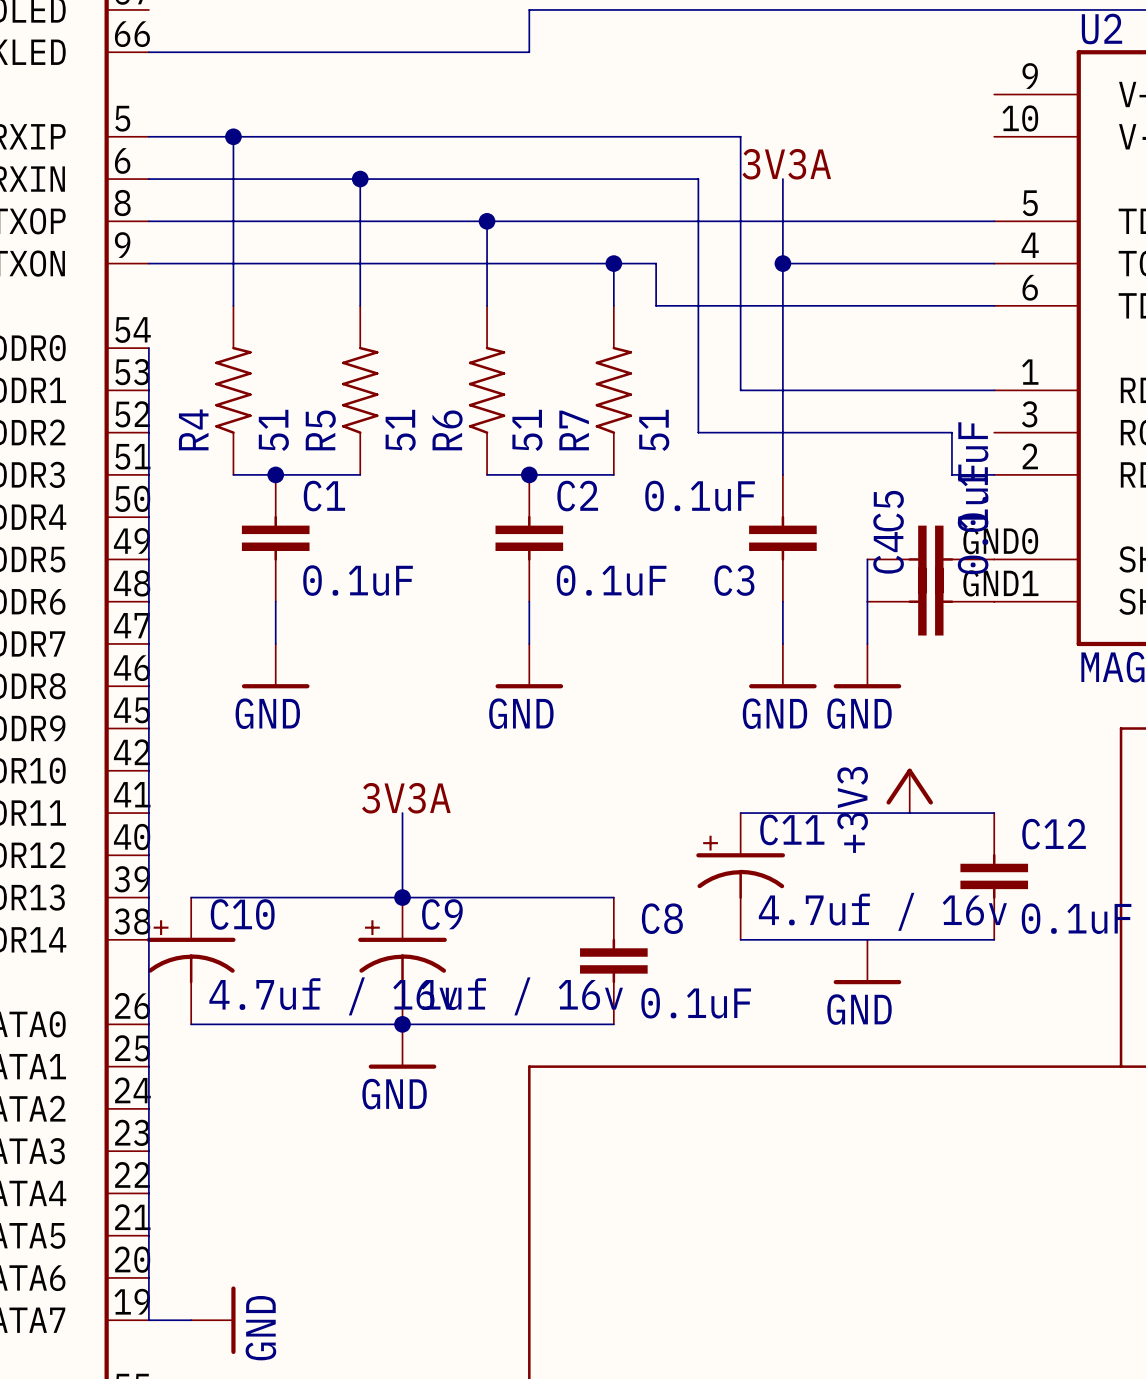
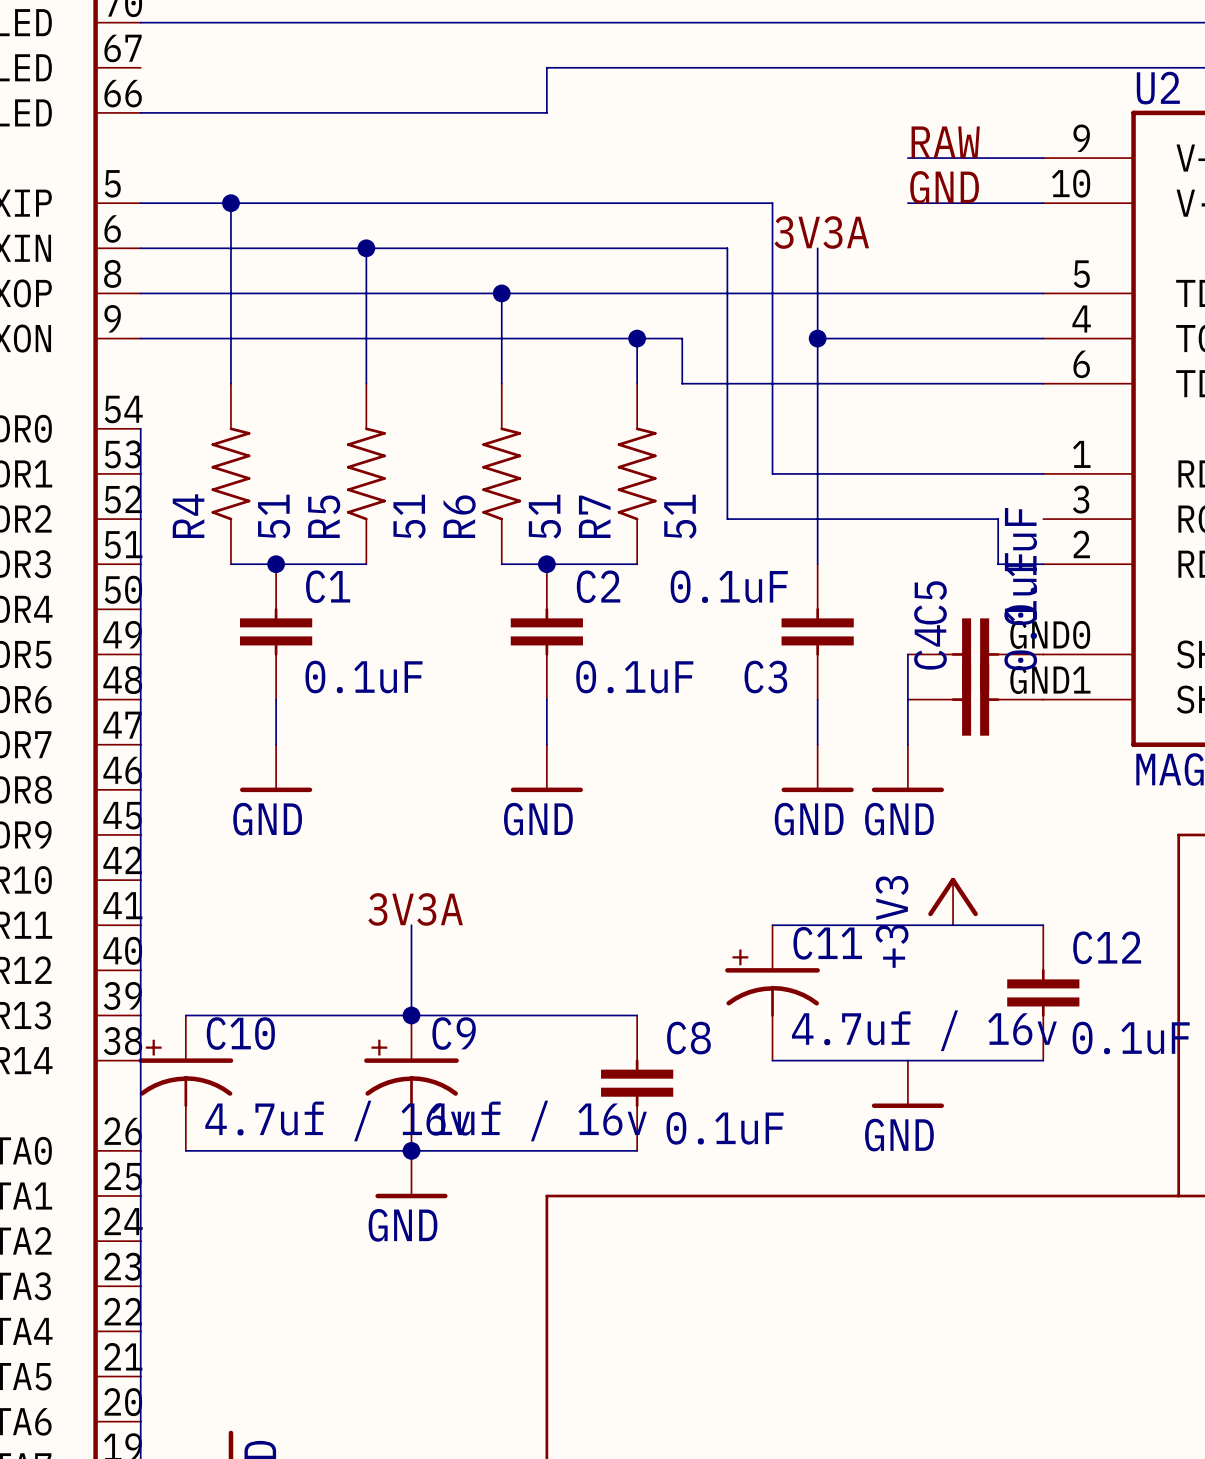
label: none -> RAW (945, 142)
wire: none -> (907, 158) (1043, 158)
label: none -> GND (944, 187)
wire: none -> (907, 203) (1043, 203)

